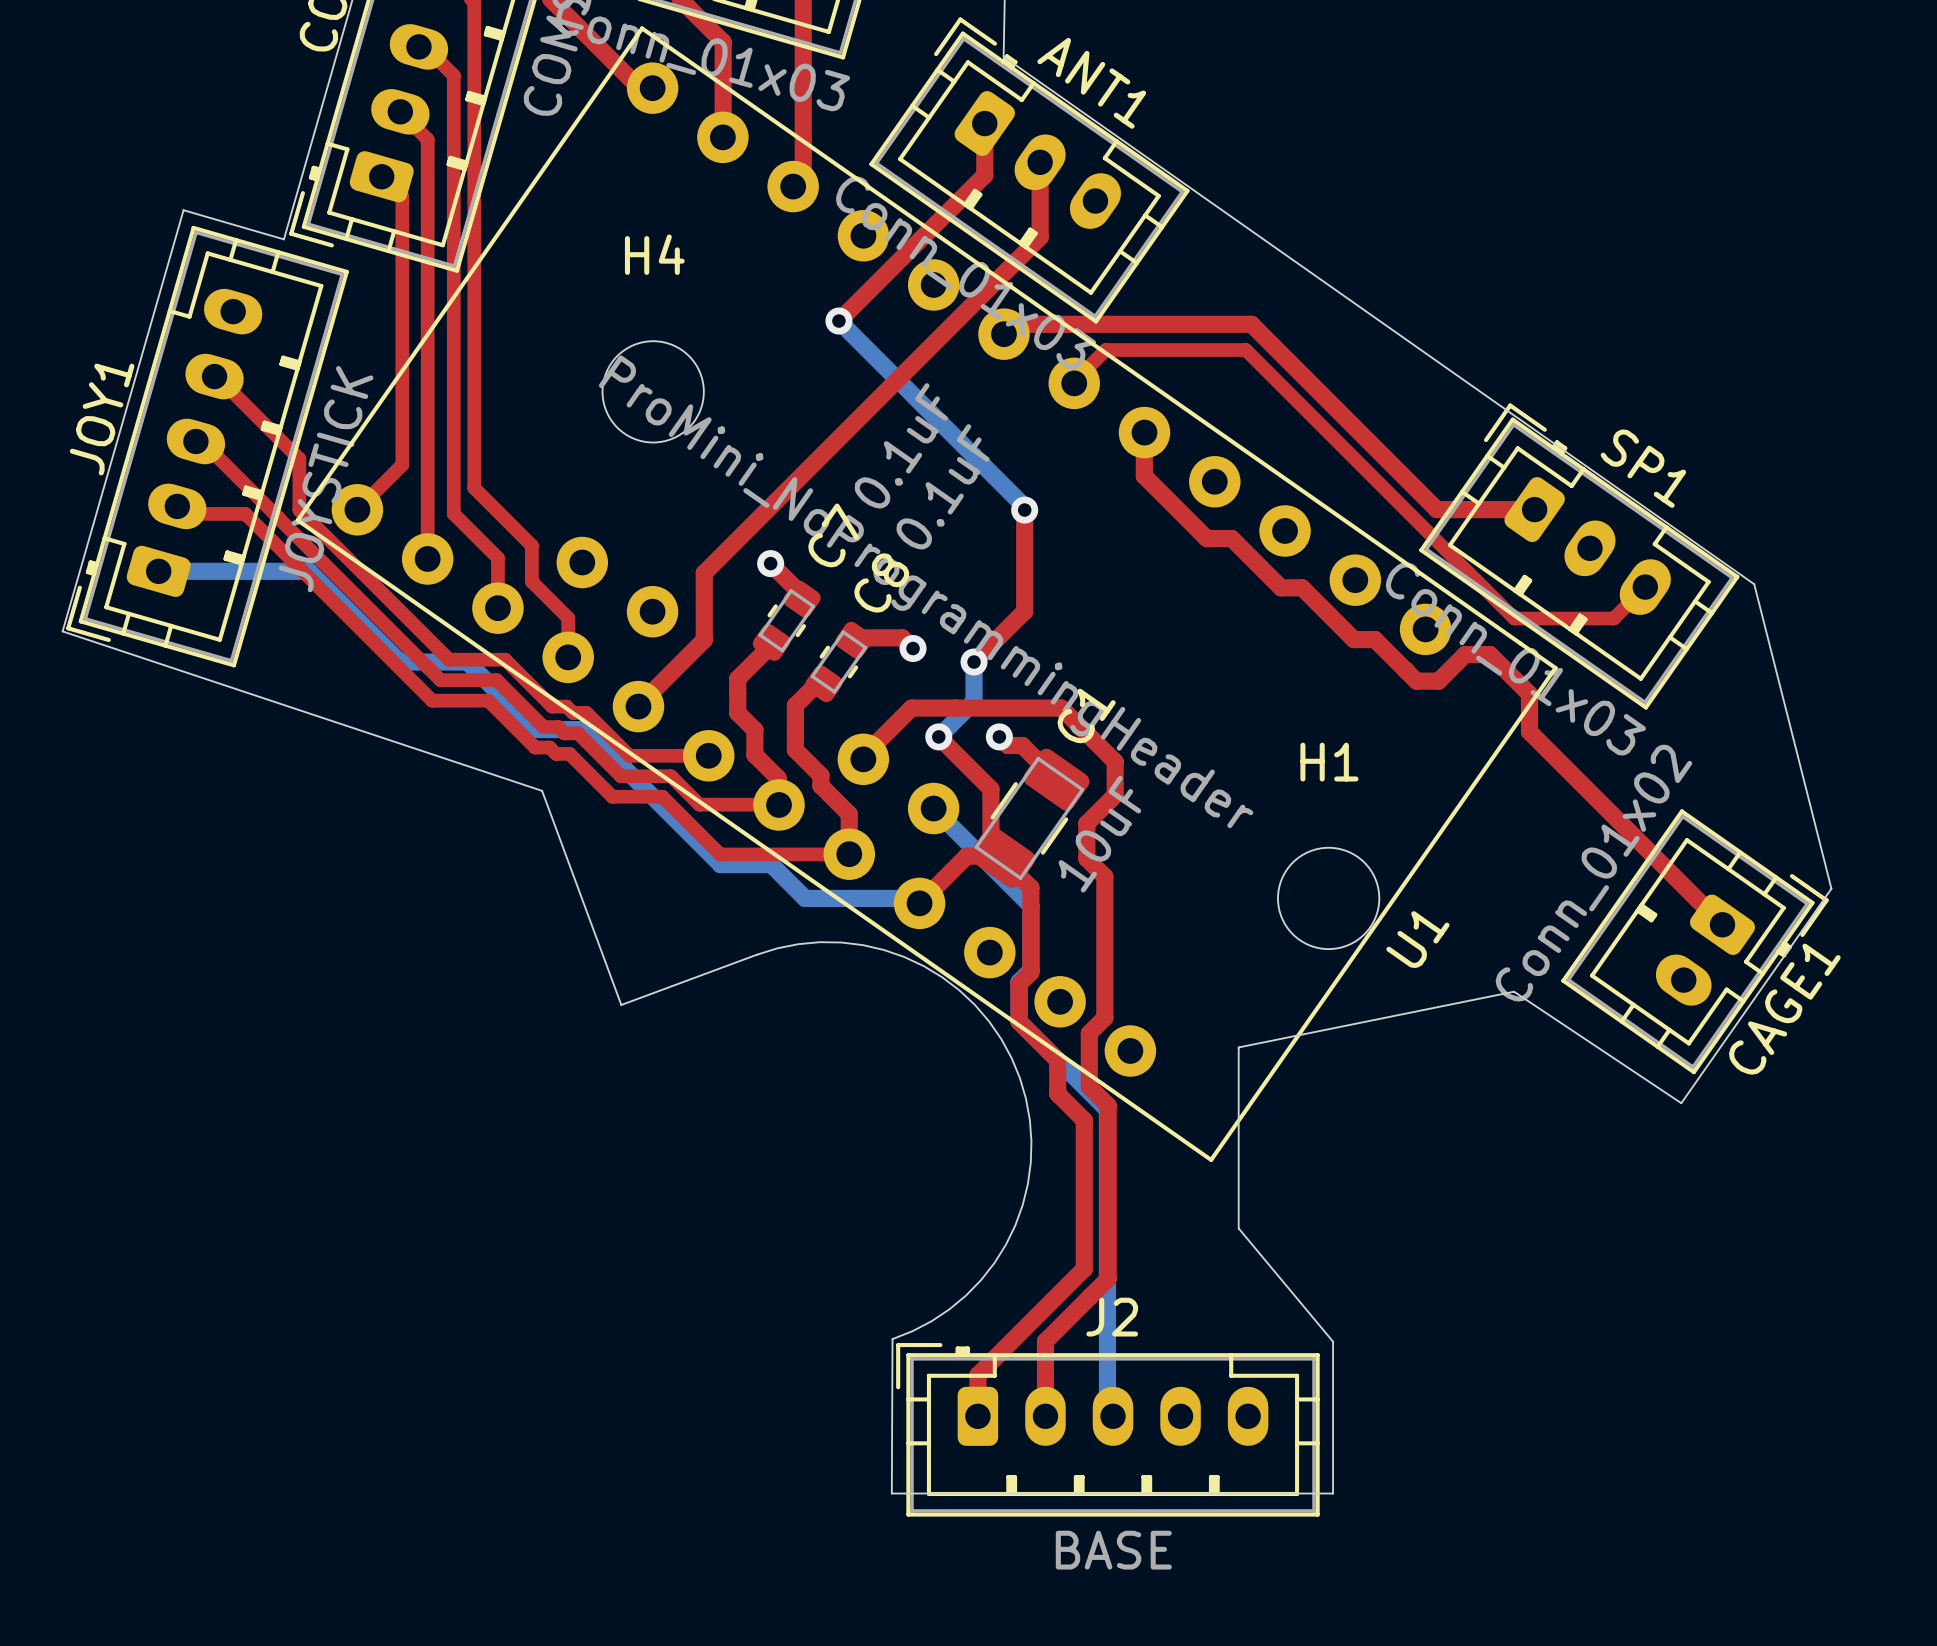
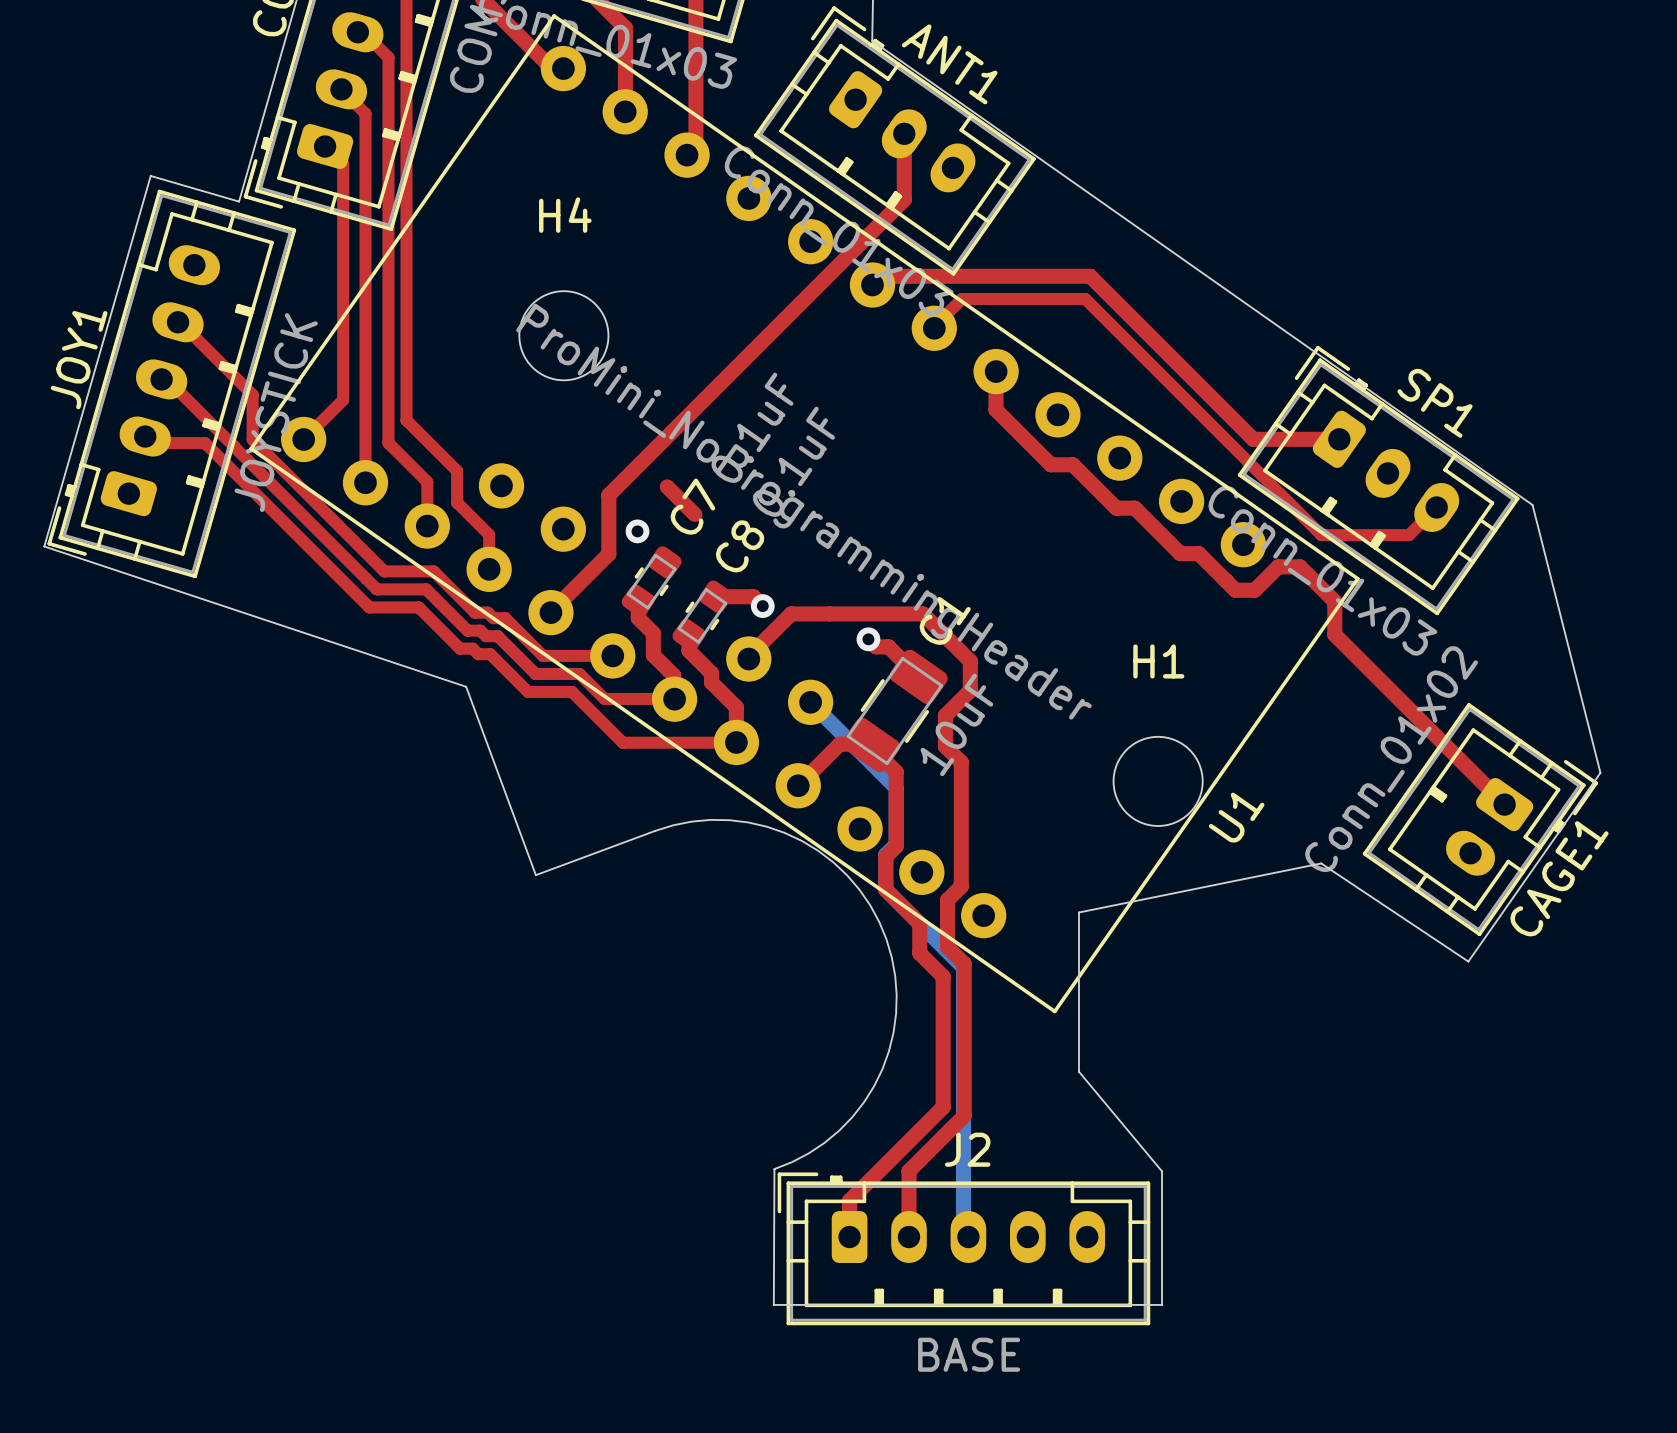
top track: (984, 123) (984, 175) (838, 321) -> none
bottom track: (838, 321) (1024, 506) (1024, 510) -> none
via: (838, 321) -> none
top track: (1024, 510) (1024, 611) (974, 662) -> none
via: (1024, 510) -> none
via position: (770, 563) -> (637, 531)
bottom track: (158, 571) (309, 571) (399, 662) (467, 662) (534, 729) (585, 729) (720, 864) (771, 864) (805, 898) (923, 898) -> none
C7 position: (786, 620) -> (651, 581)
top track: (859, 637) (902, 637) (913, 648) -> (715, 596) (753, 596) (762, 606)
top track: (771, 645) (737, 678) (737, 693) -> none
via: (913, 648) -> none
C8 position: (838, 662) -> (702, 615)
bottom track: (974, 662) (974, 701) (938, 736) -> none
via: (974, 662) -> none
top track: (822, 678) (795, 705) (795, 732) -> none
via: none -> (762, 606)
top track: (938, 736) (990, 789) (990, 847) -> none
via: (938, 736) -> none

